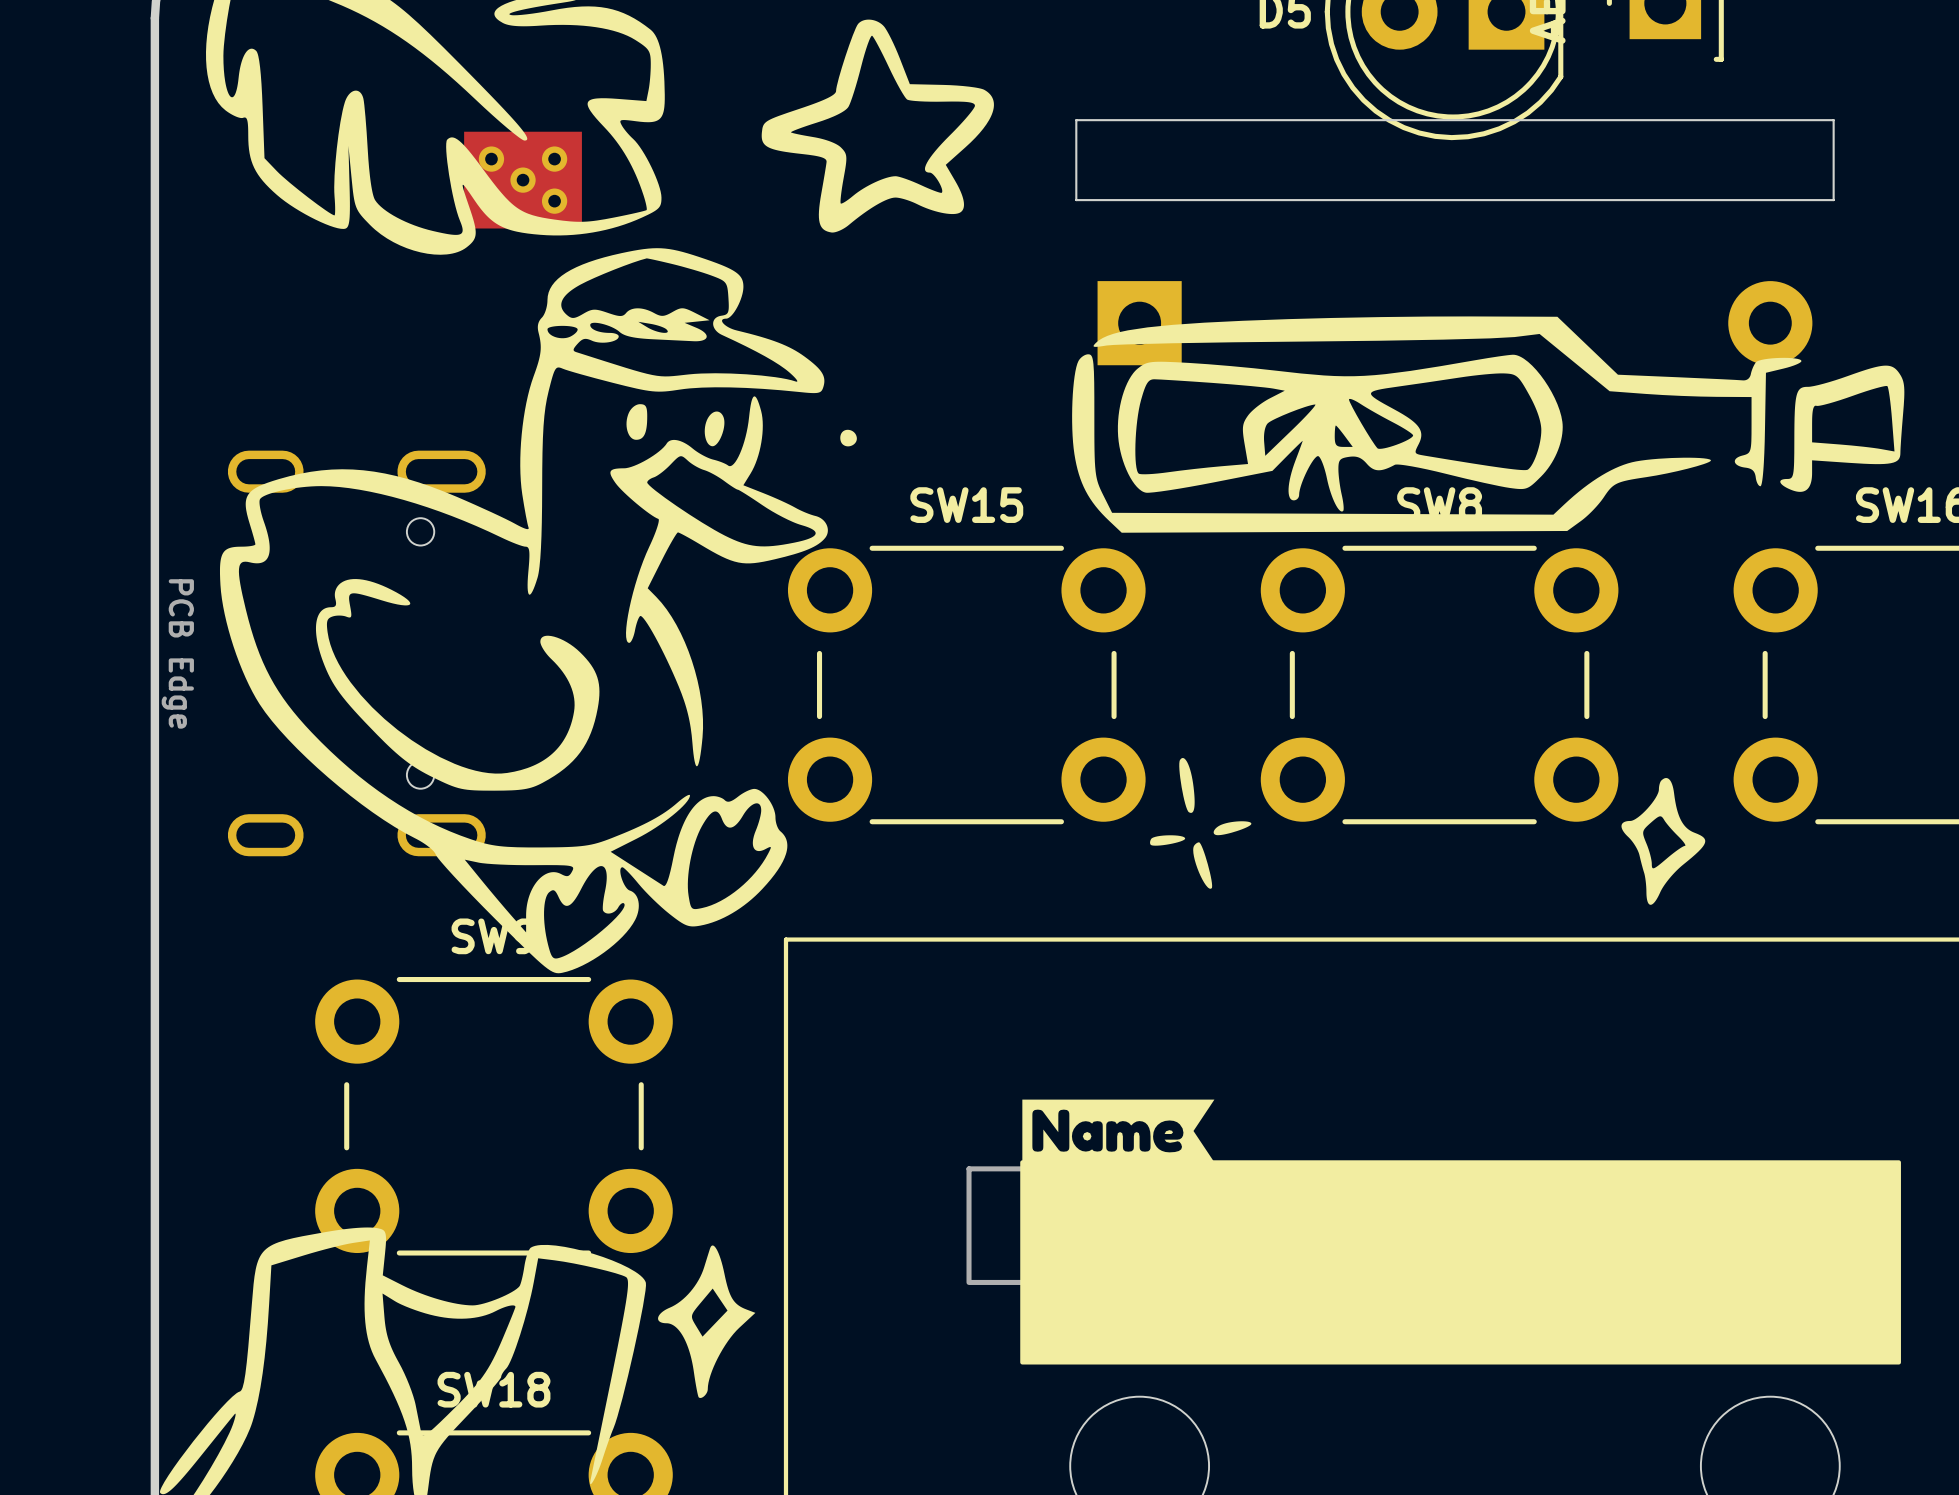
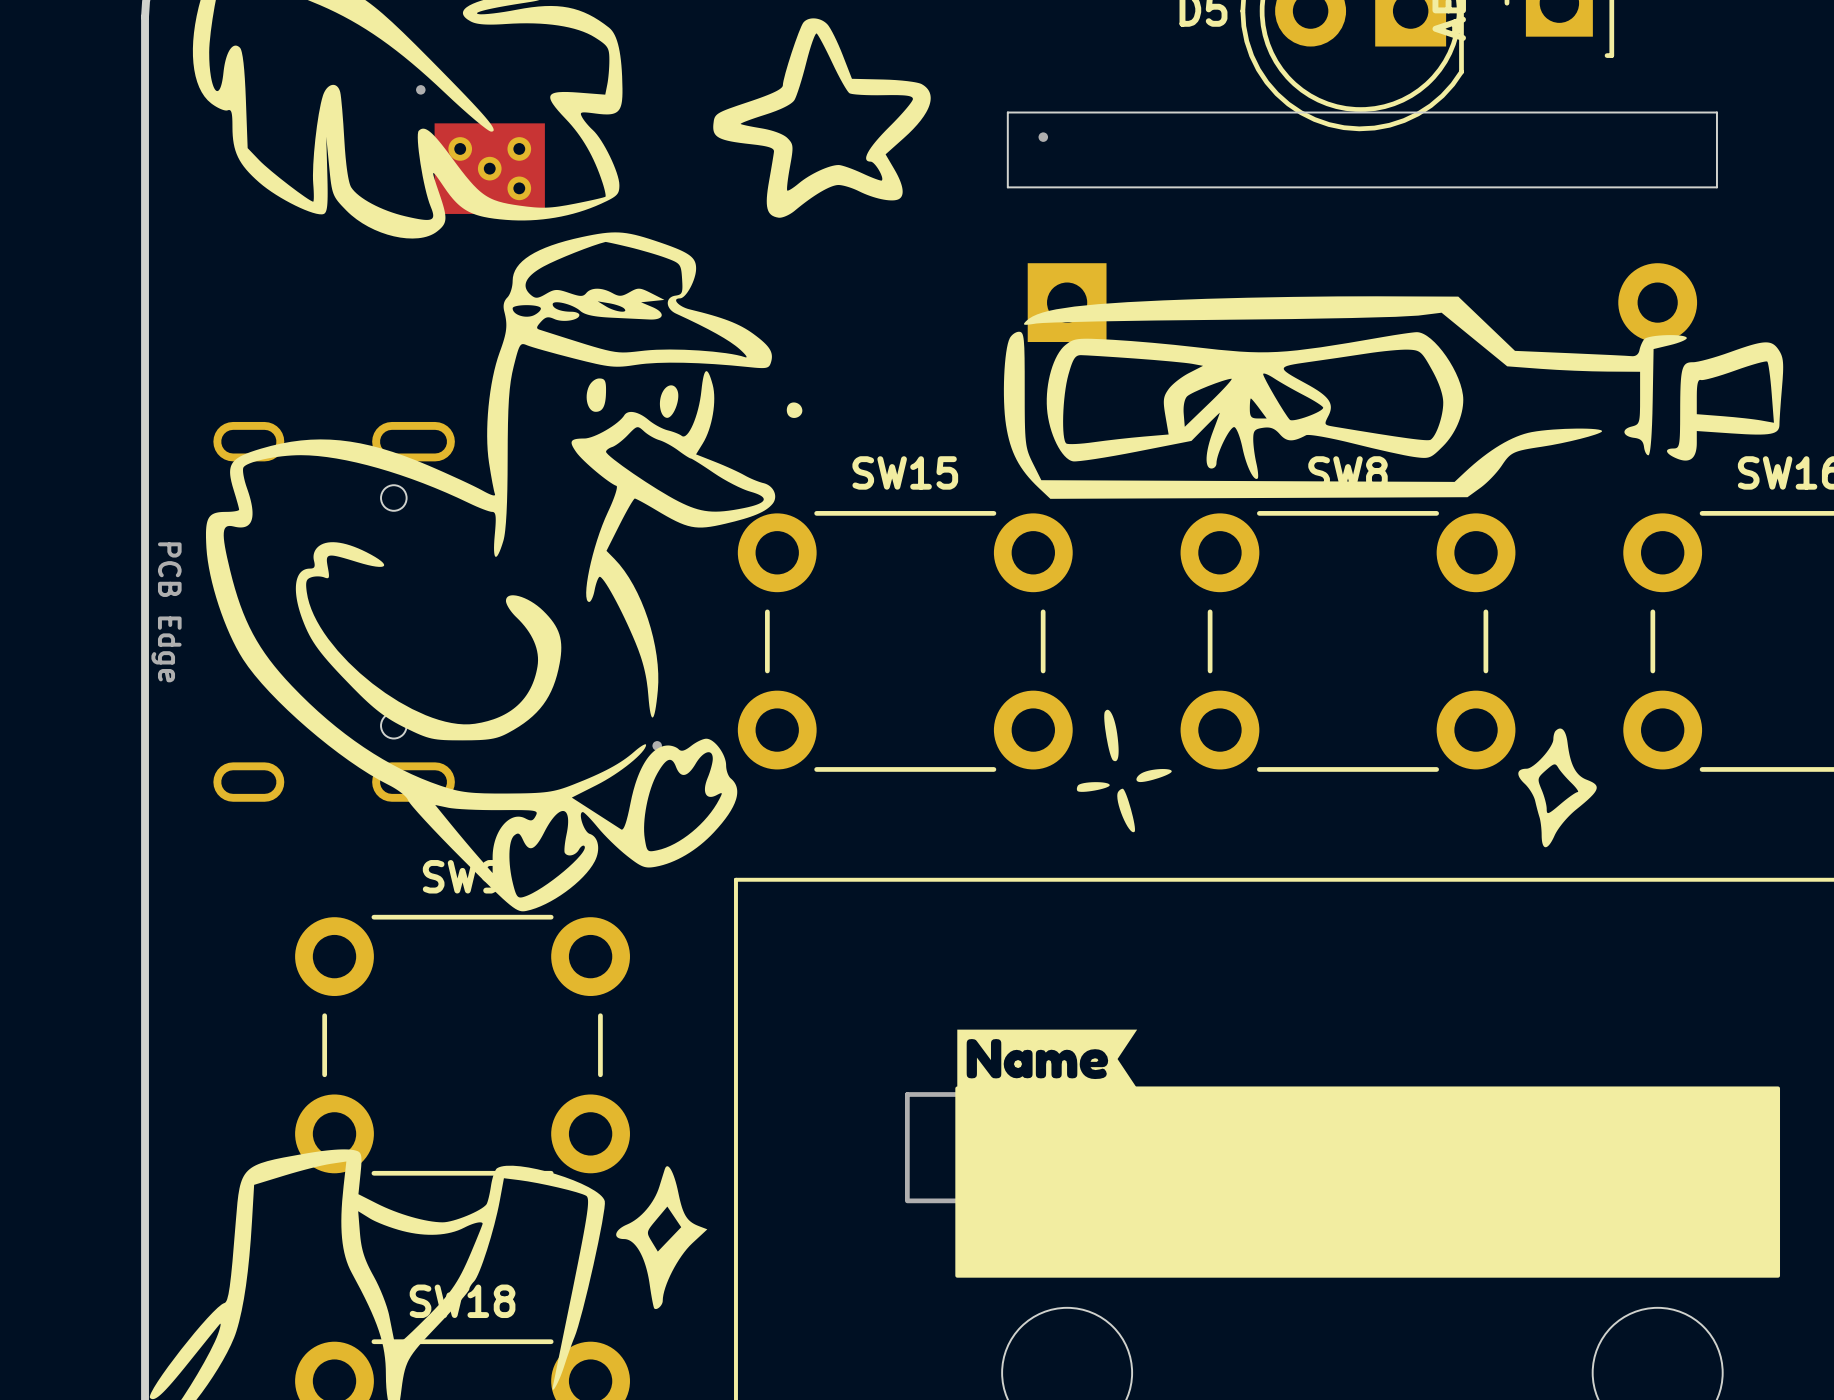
drawing: none -> [416, 85, 426, 95]
drawing: none -> [1038, 132, 1049, 142]
drawing: none -> [652, 741, 662, 751]

